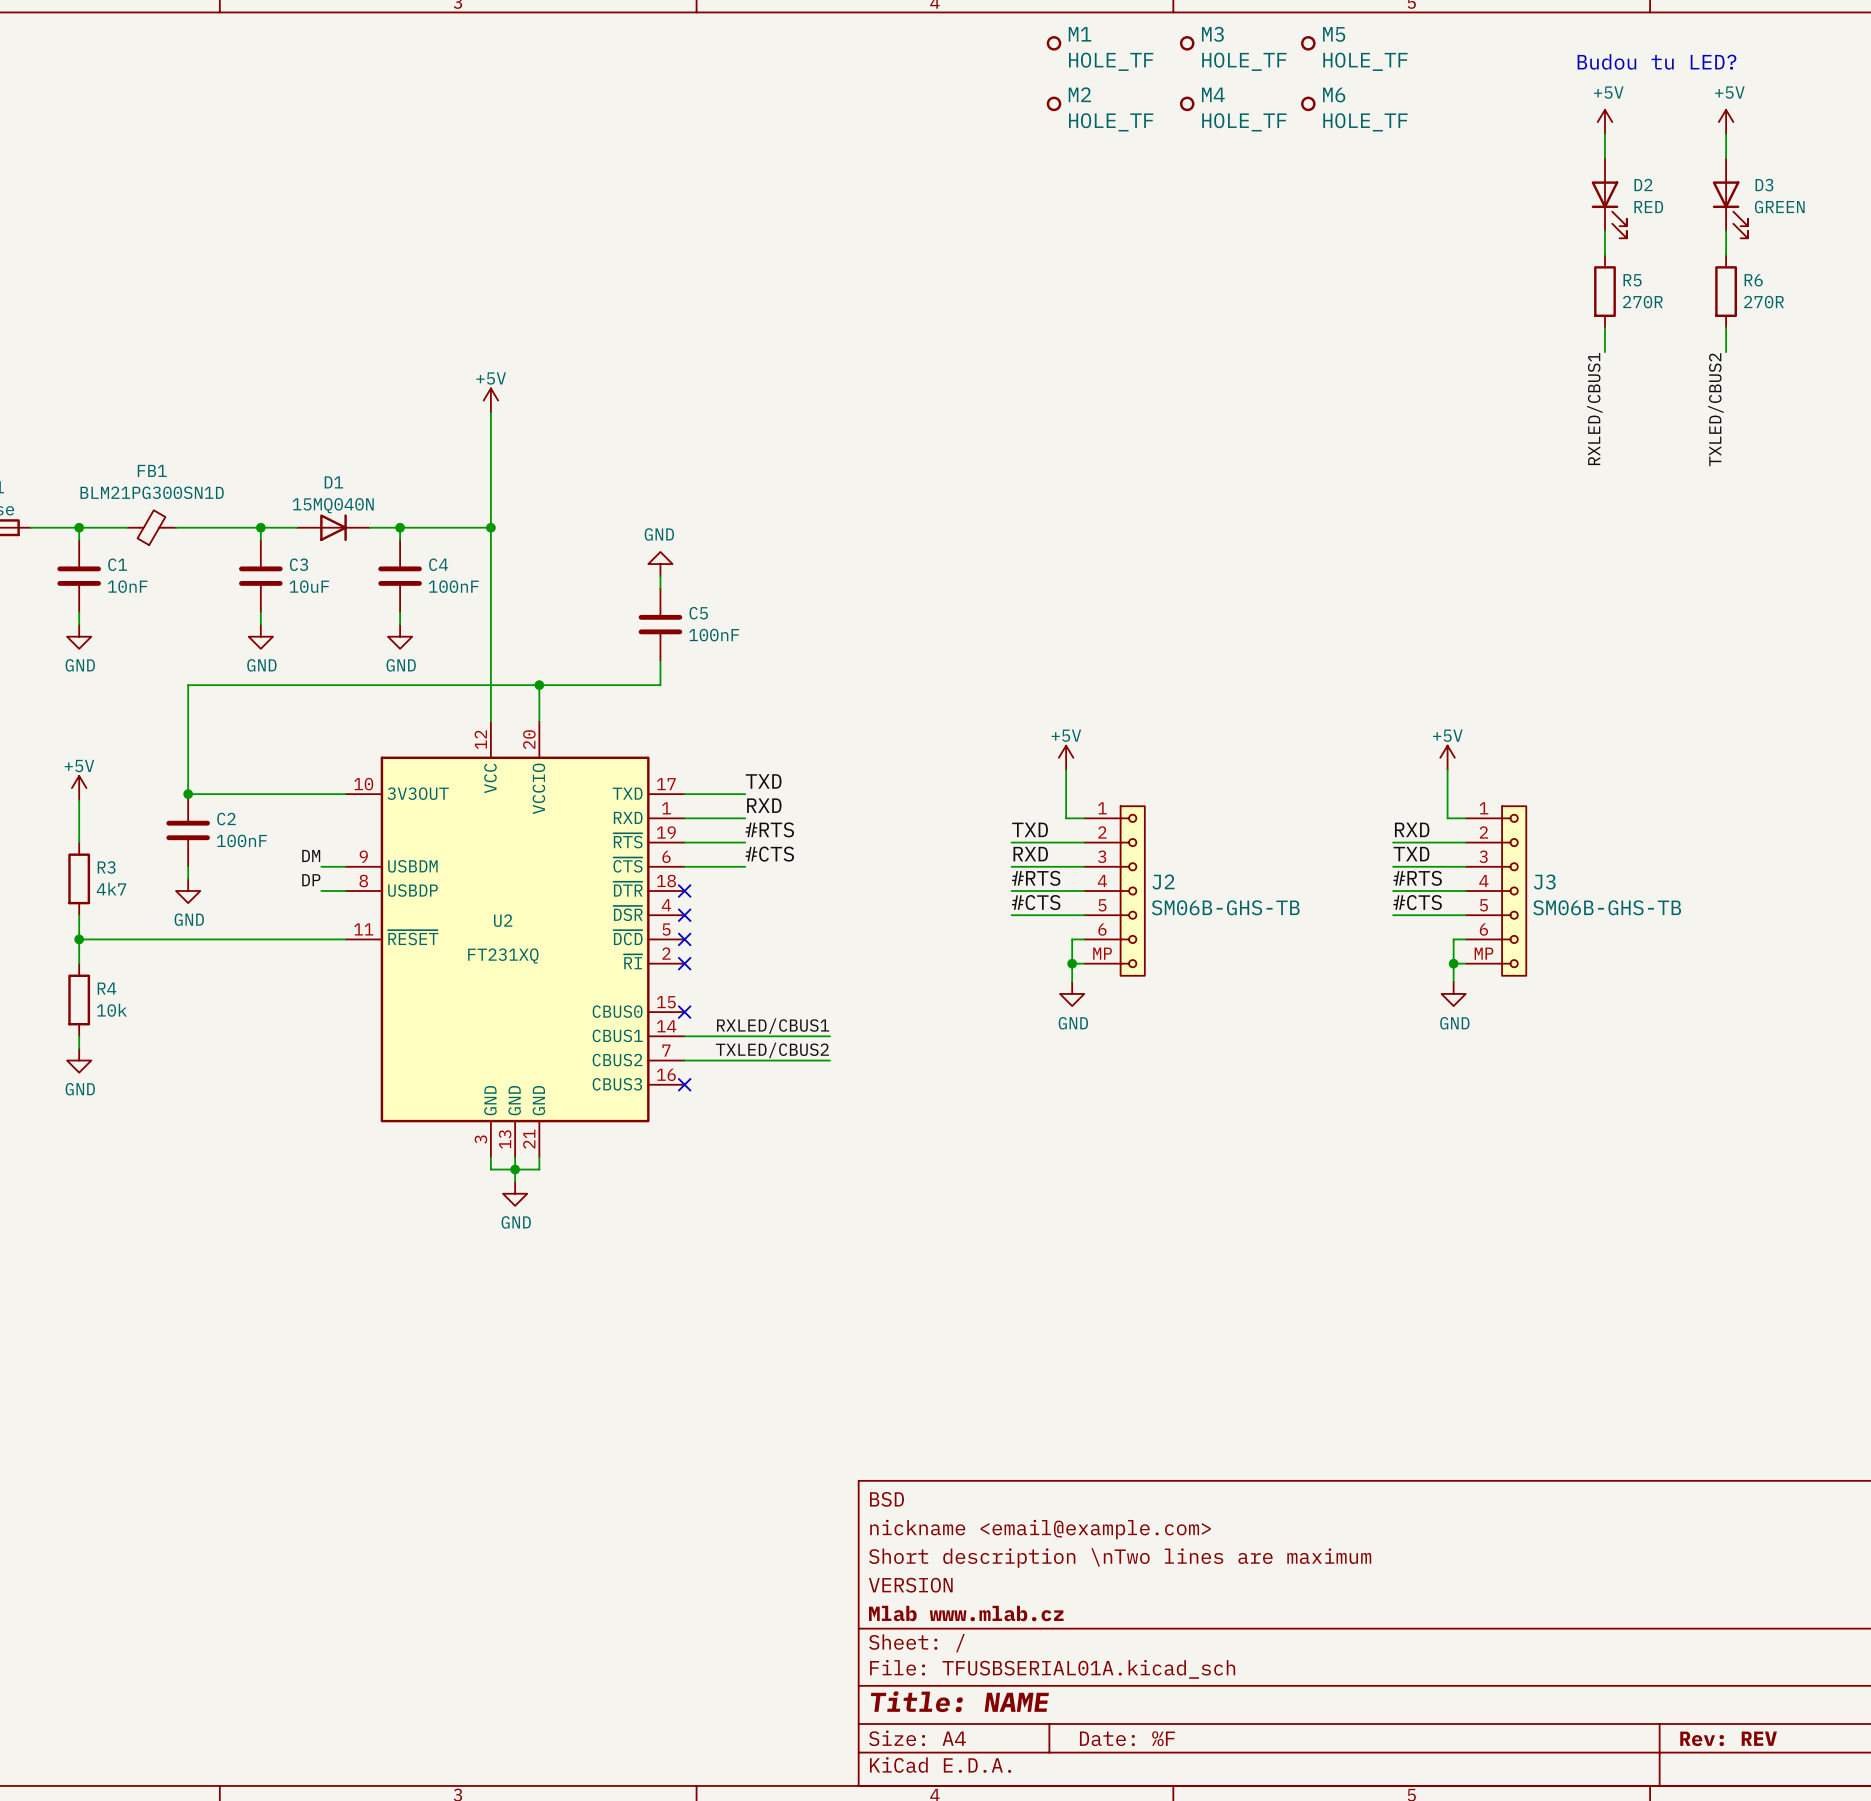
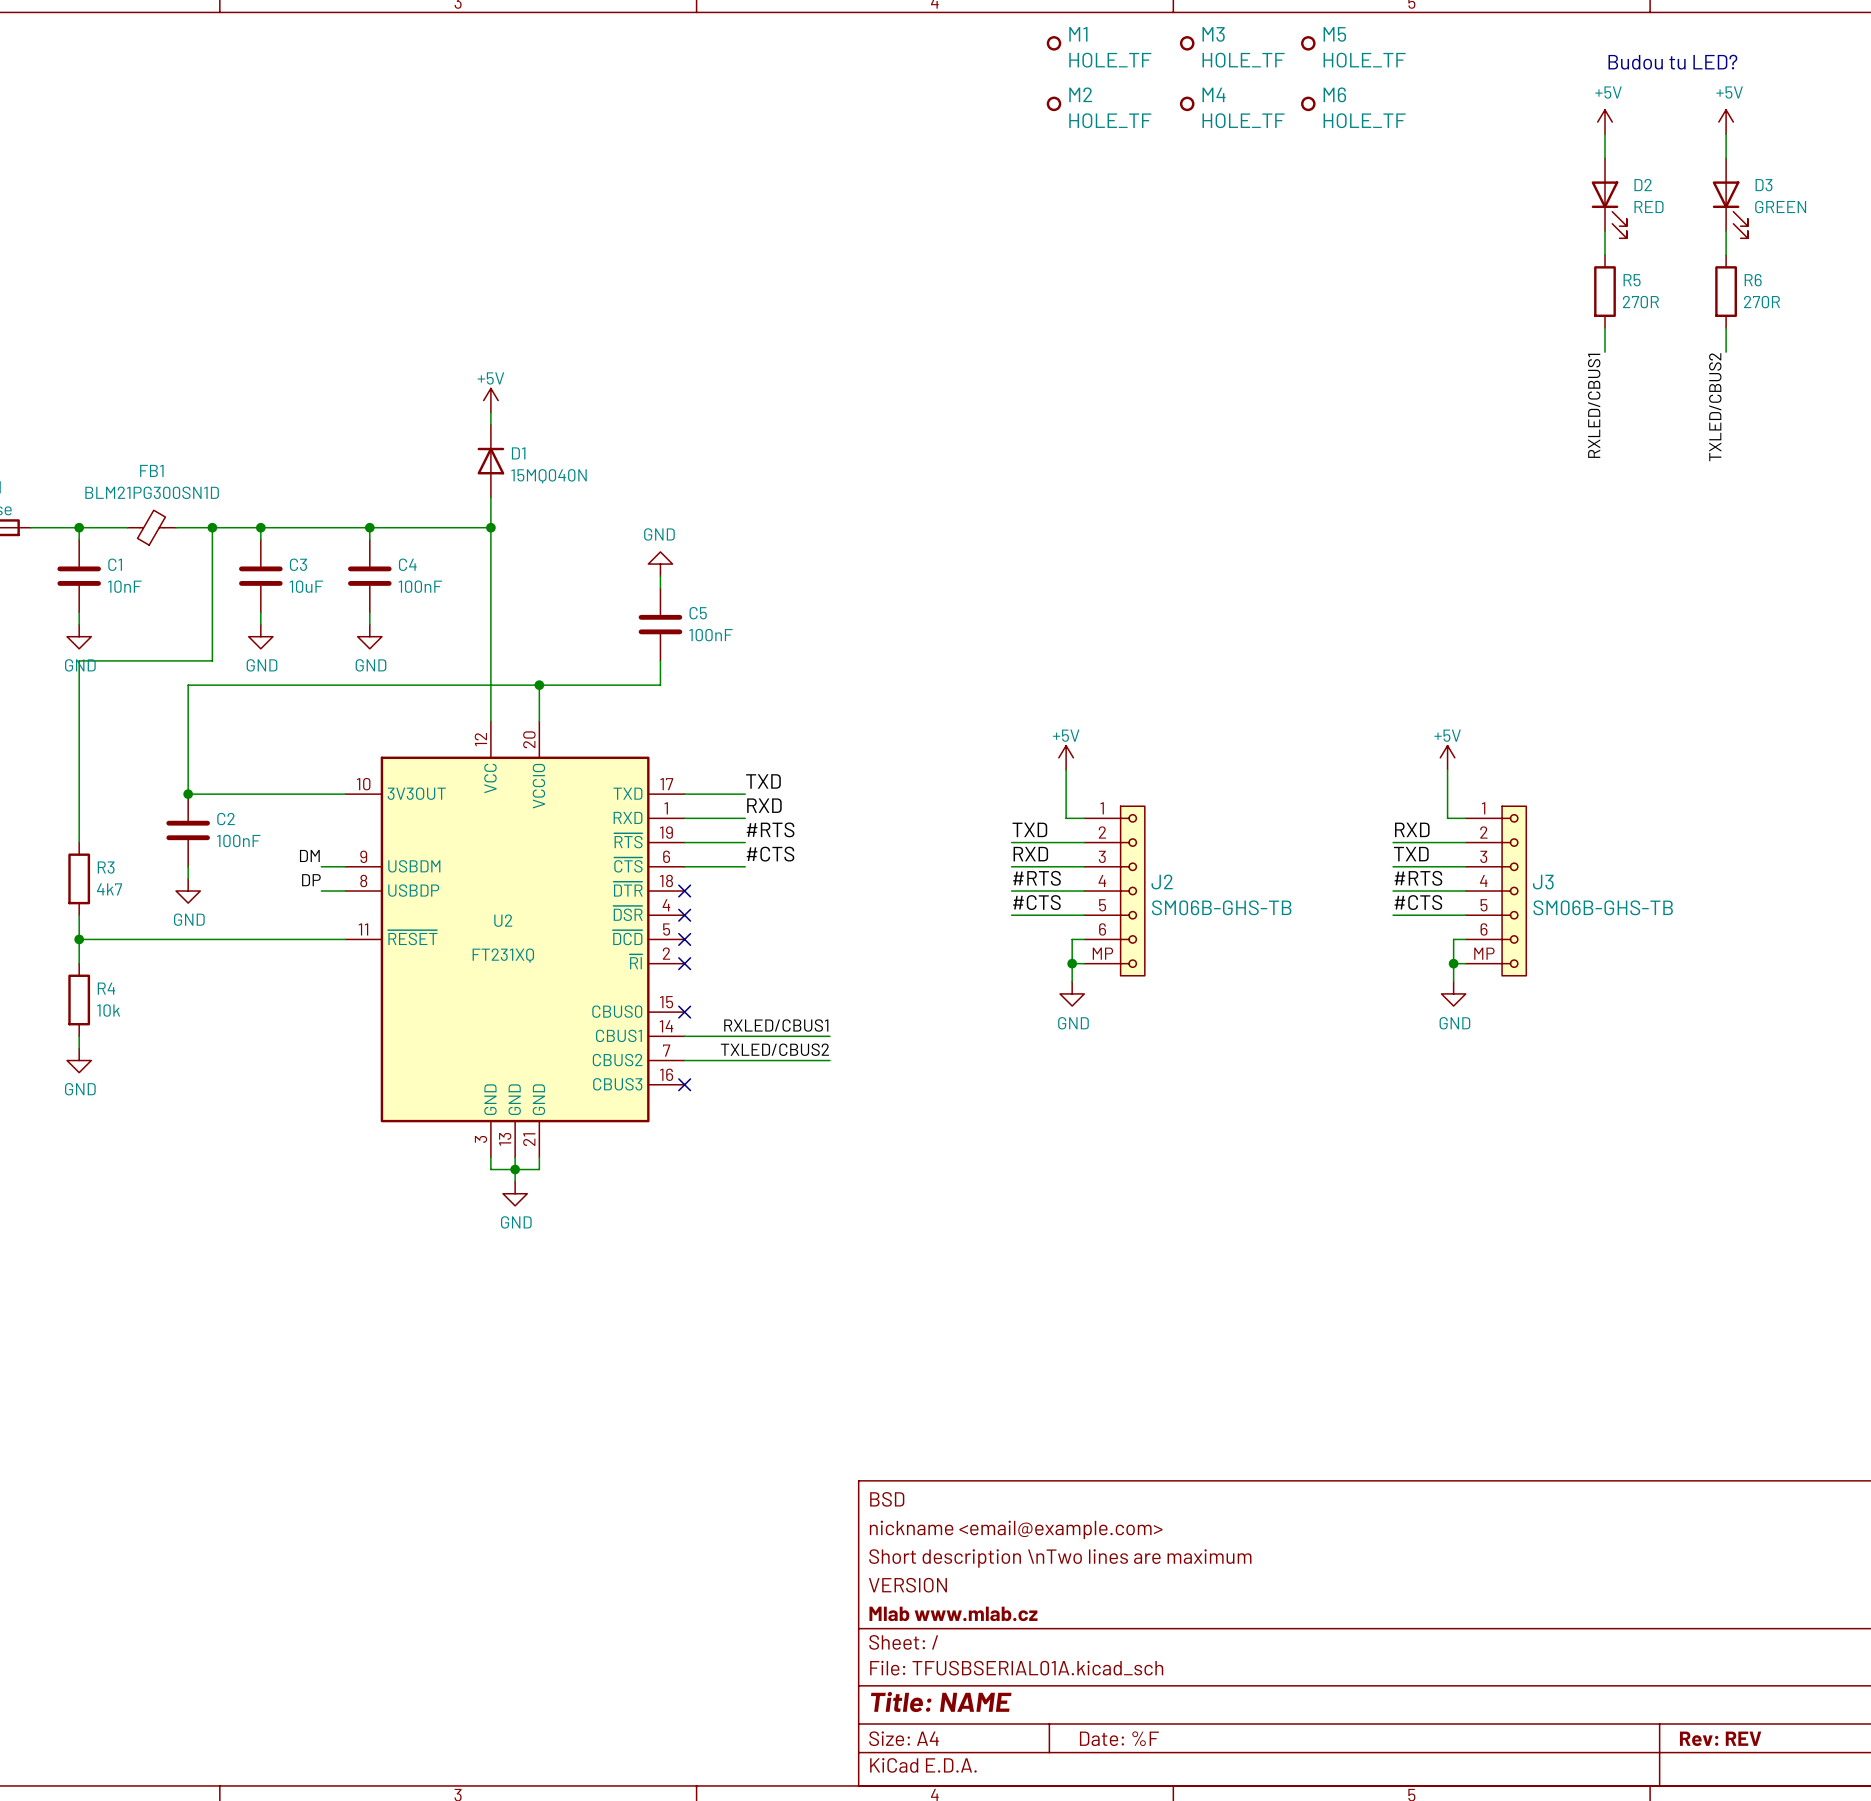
D1 name position: D1 (333, 482) -> D1 (518, 453)
D1 value position: 15MQ040N (333, 505) -> 15MQ040N (549, 476)
wire: none -> (212, 527) (212, 660) (79, 660) (79, 800)
junction: none -> (212, 527)
D1 rotation: 0° (333, 527) -> 90° counterclockwise (490, 461)
D1 position: (333, 527) -> (490, 461)
wire: (400, 527) (400, 539) -> none
junction position: (400, 527) -> (369, 527)
C4 position: (400, 576) -> (369, 576)
wire: (400, 612) (400, 624) -> (369, 612) (369, 624)
power symbol position: GND (400, 636) -> GND (369, 636)
power symbol: +5V (79, 788) -> none

